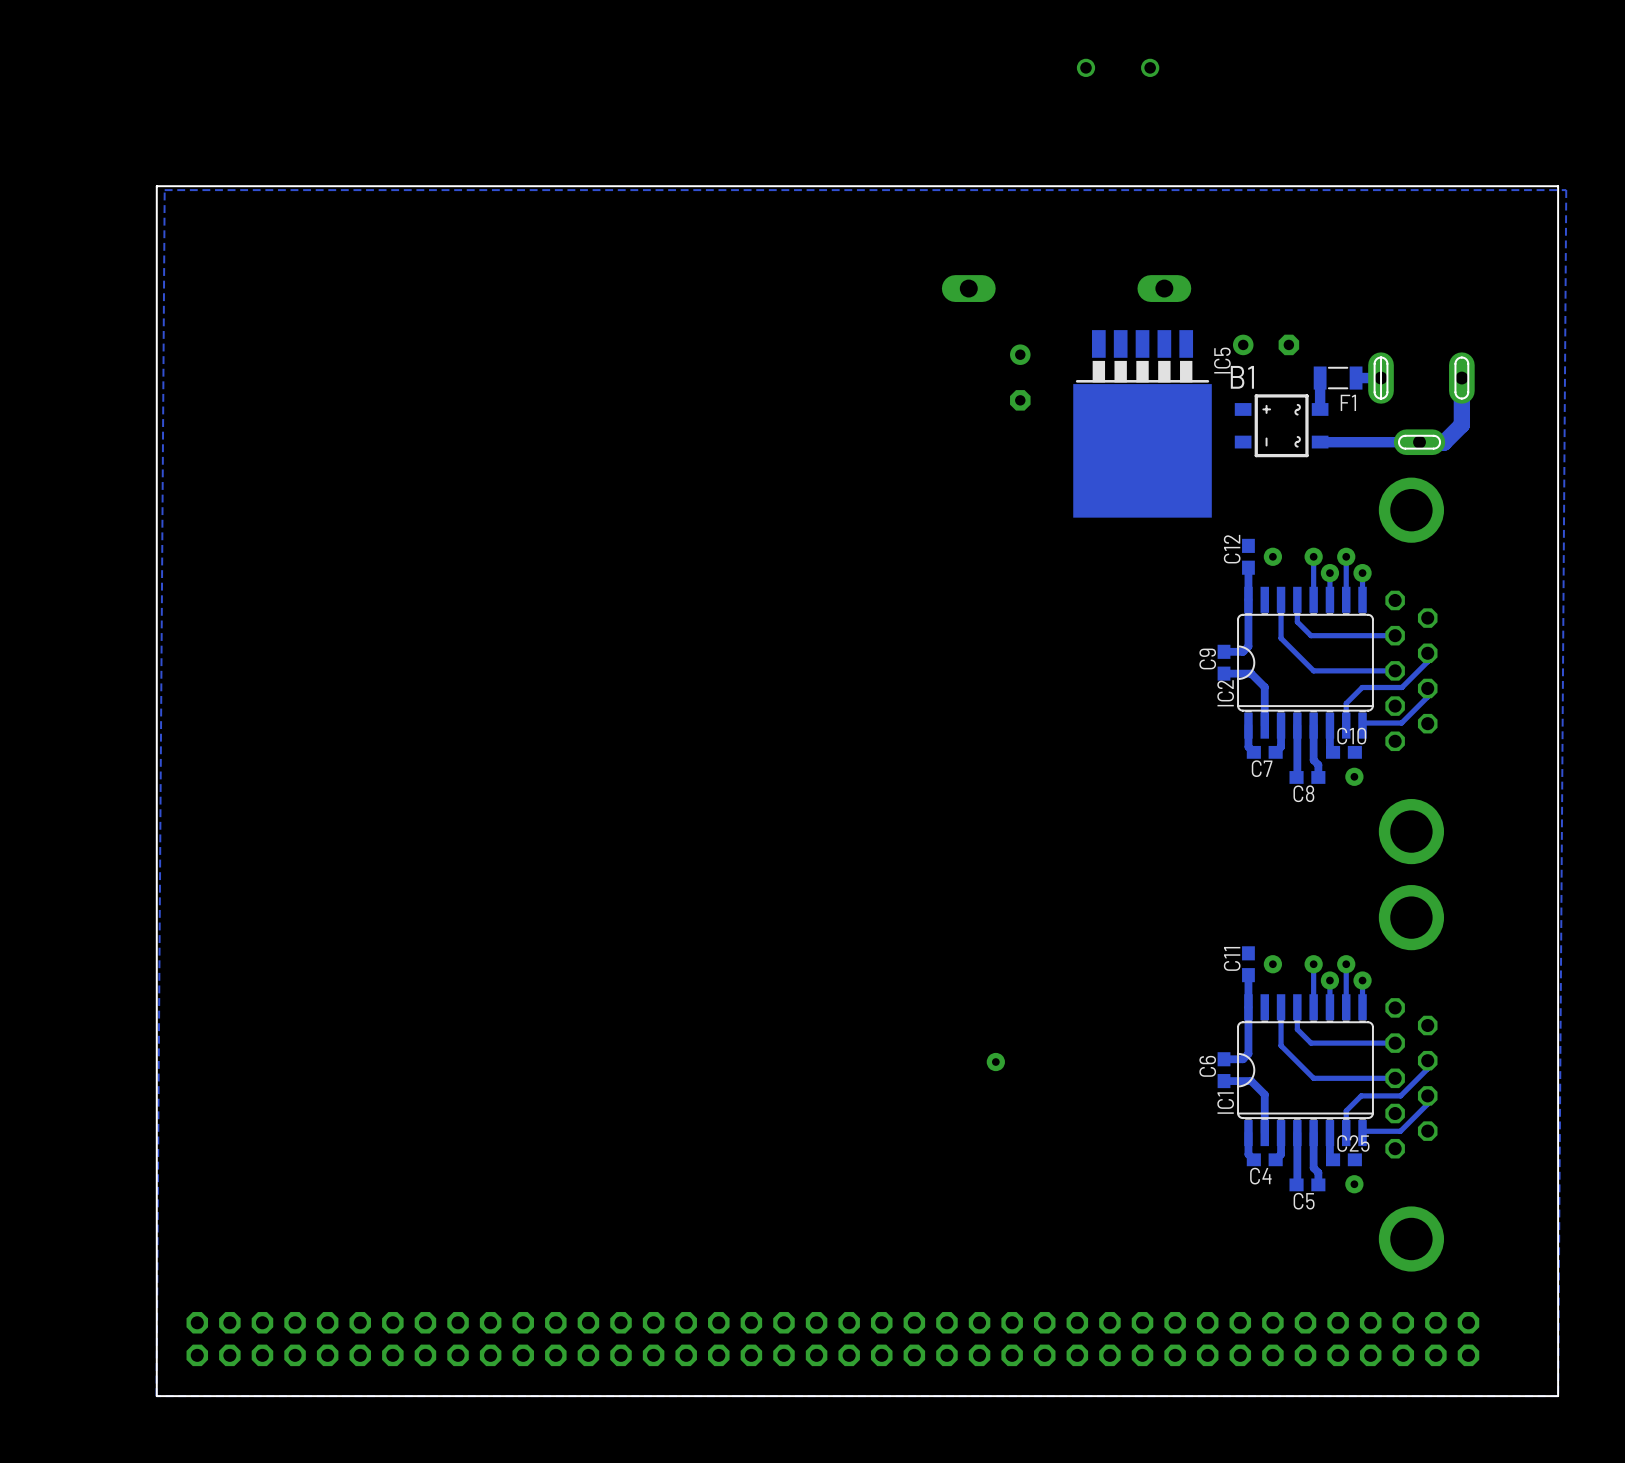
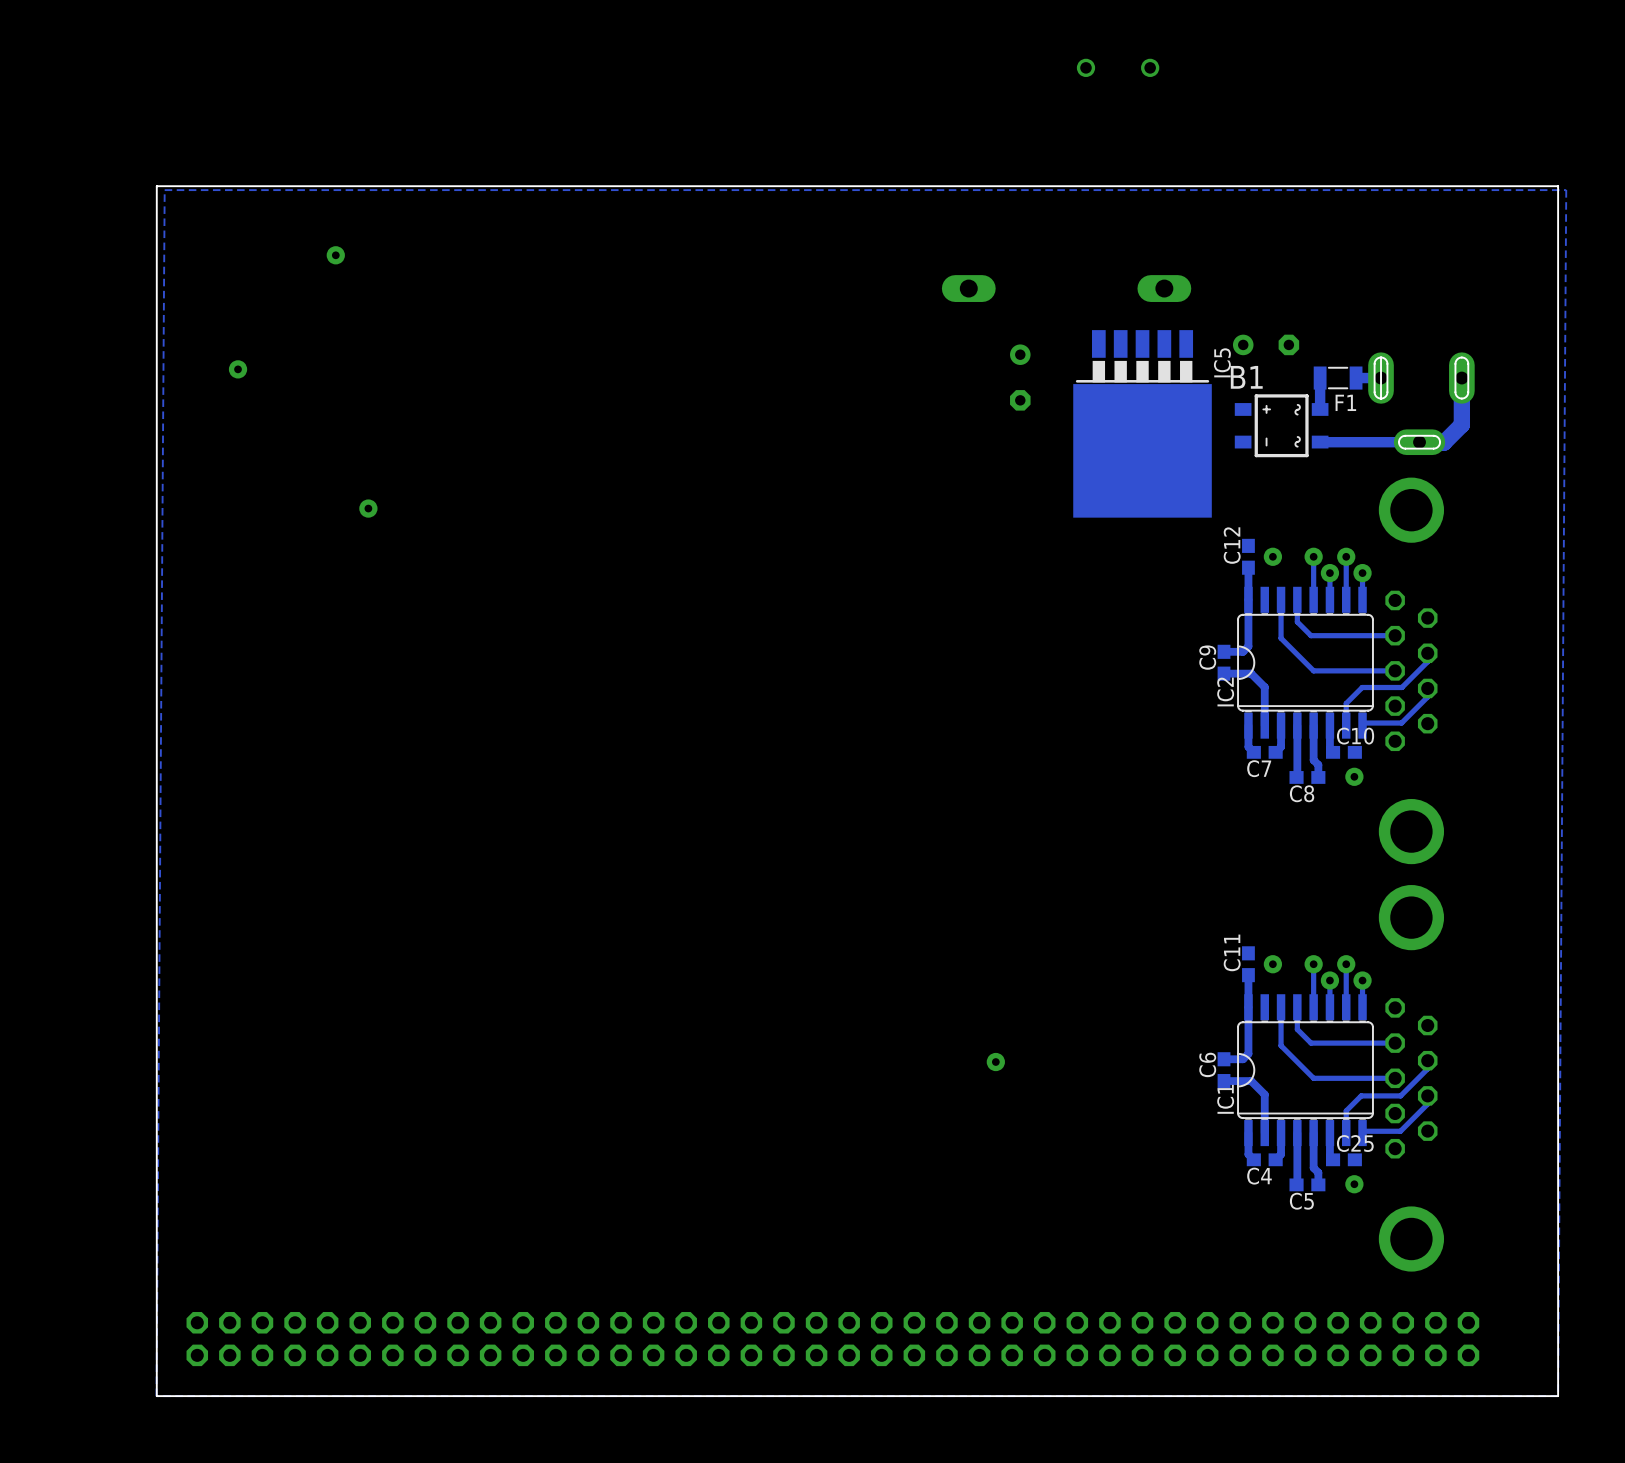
via: none -> (335, 255)
via: none -> (238, 369)
via: none -> (368, 508)

